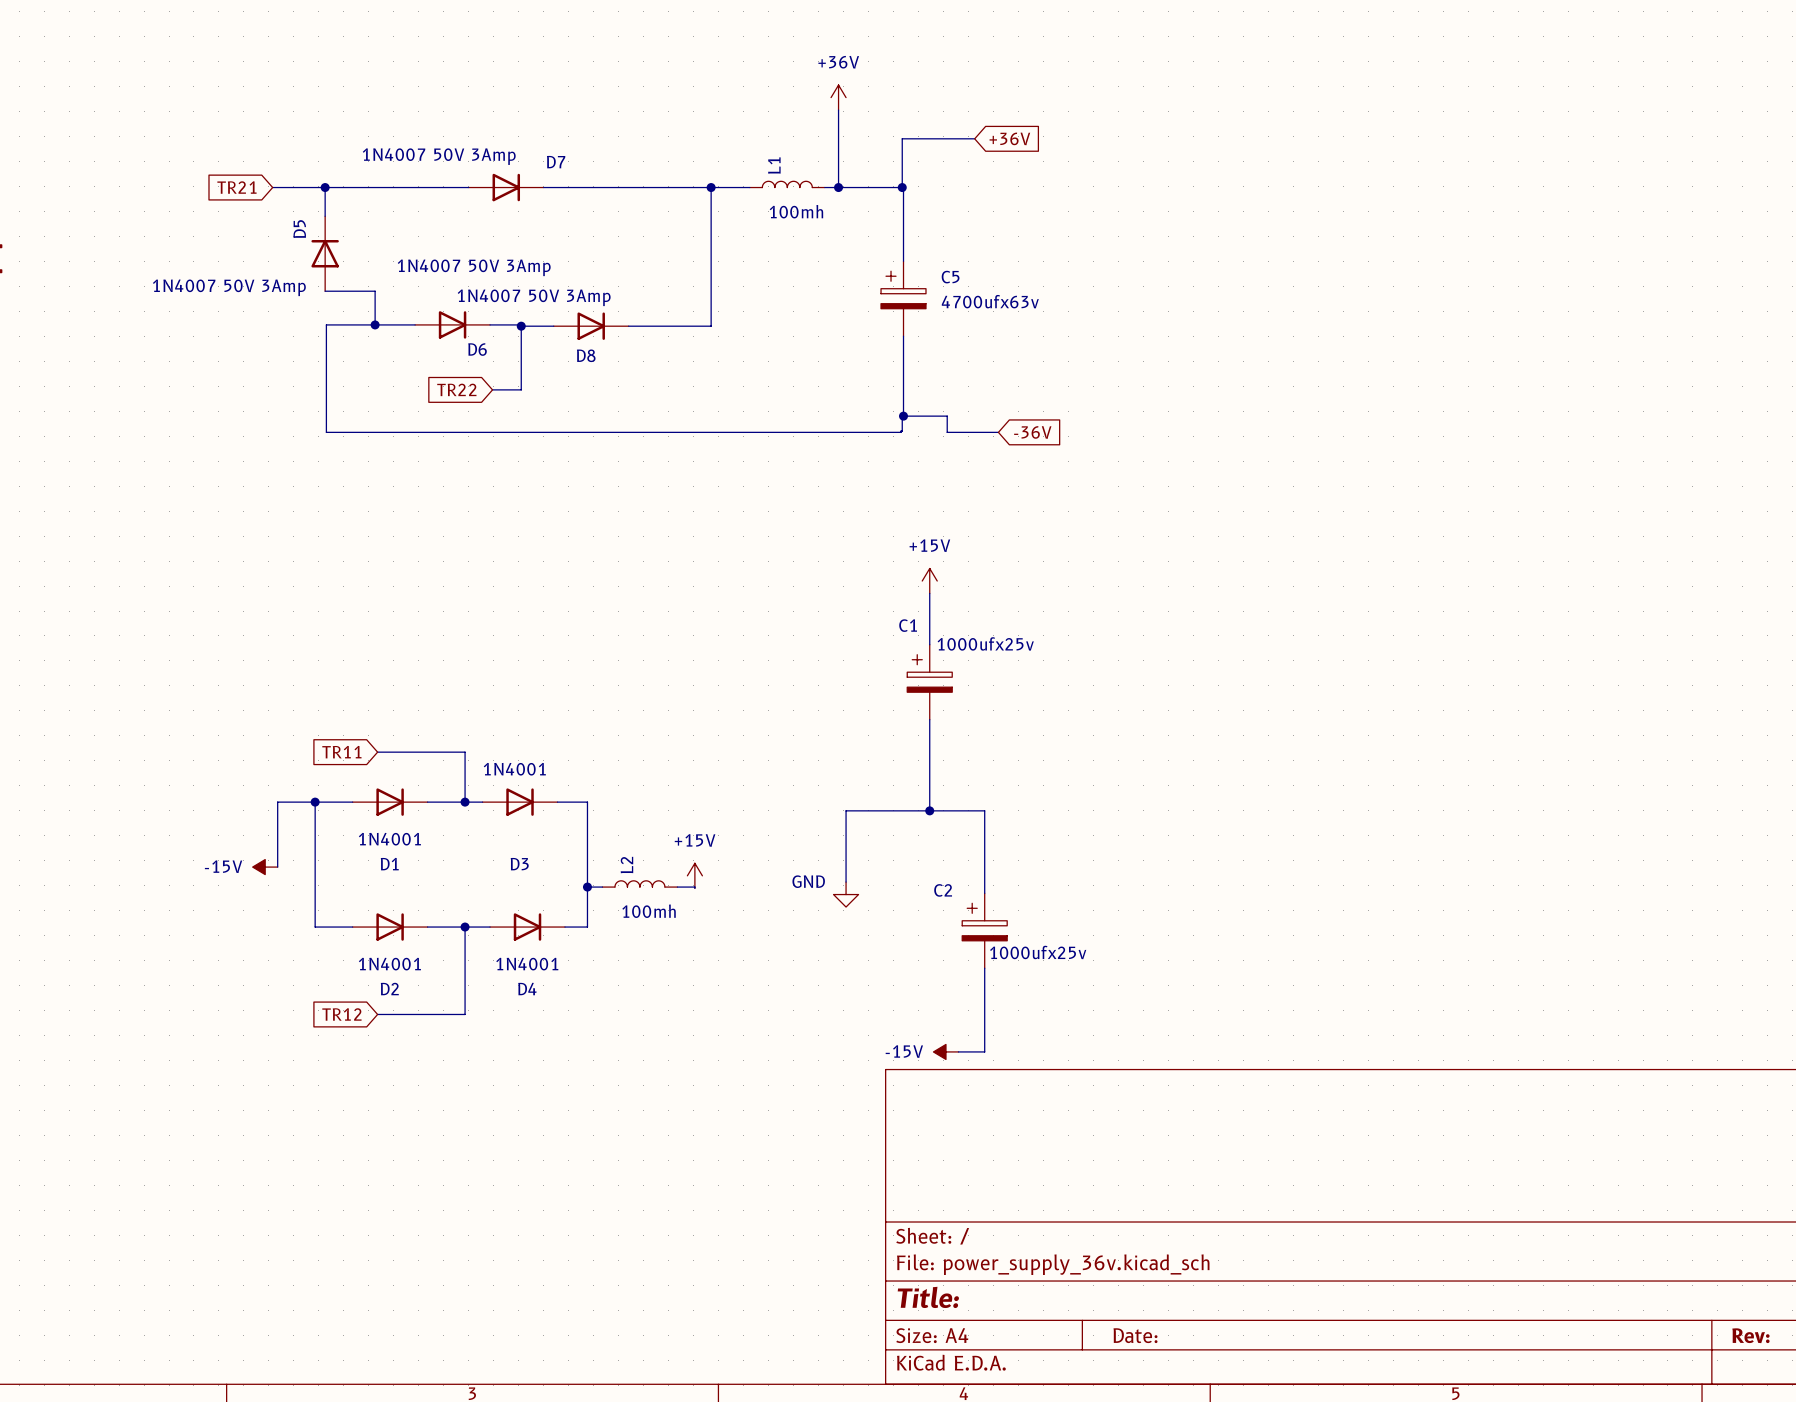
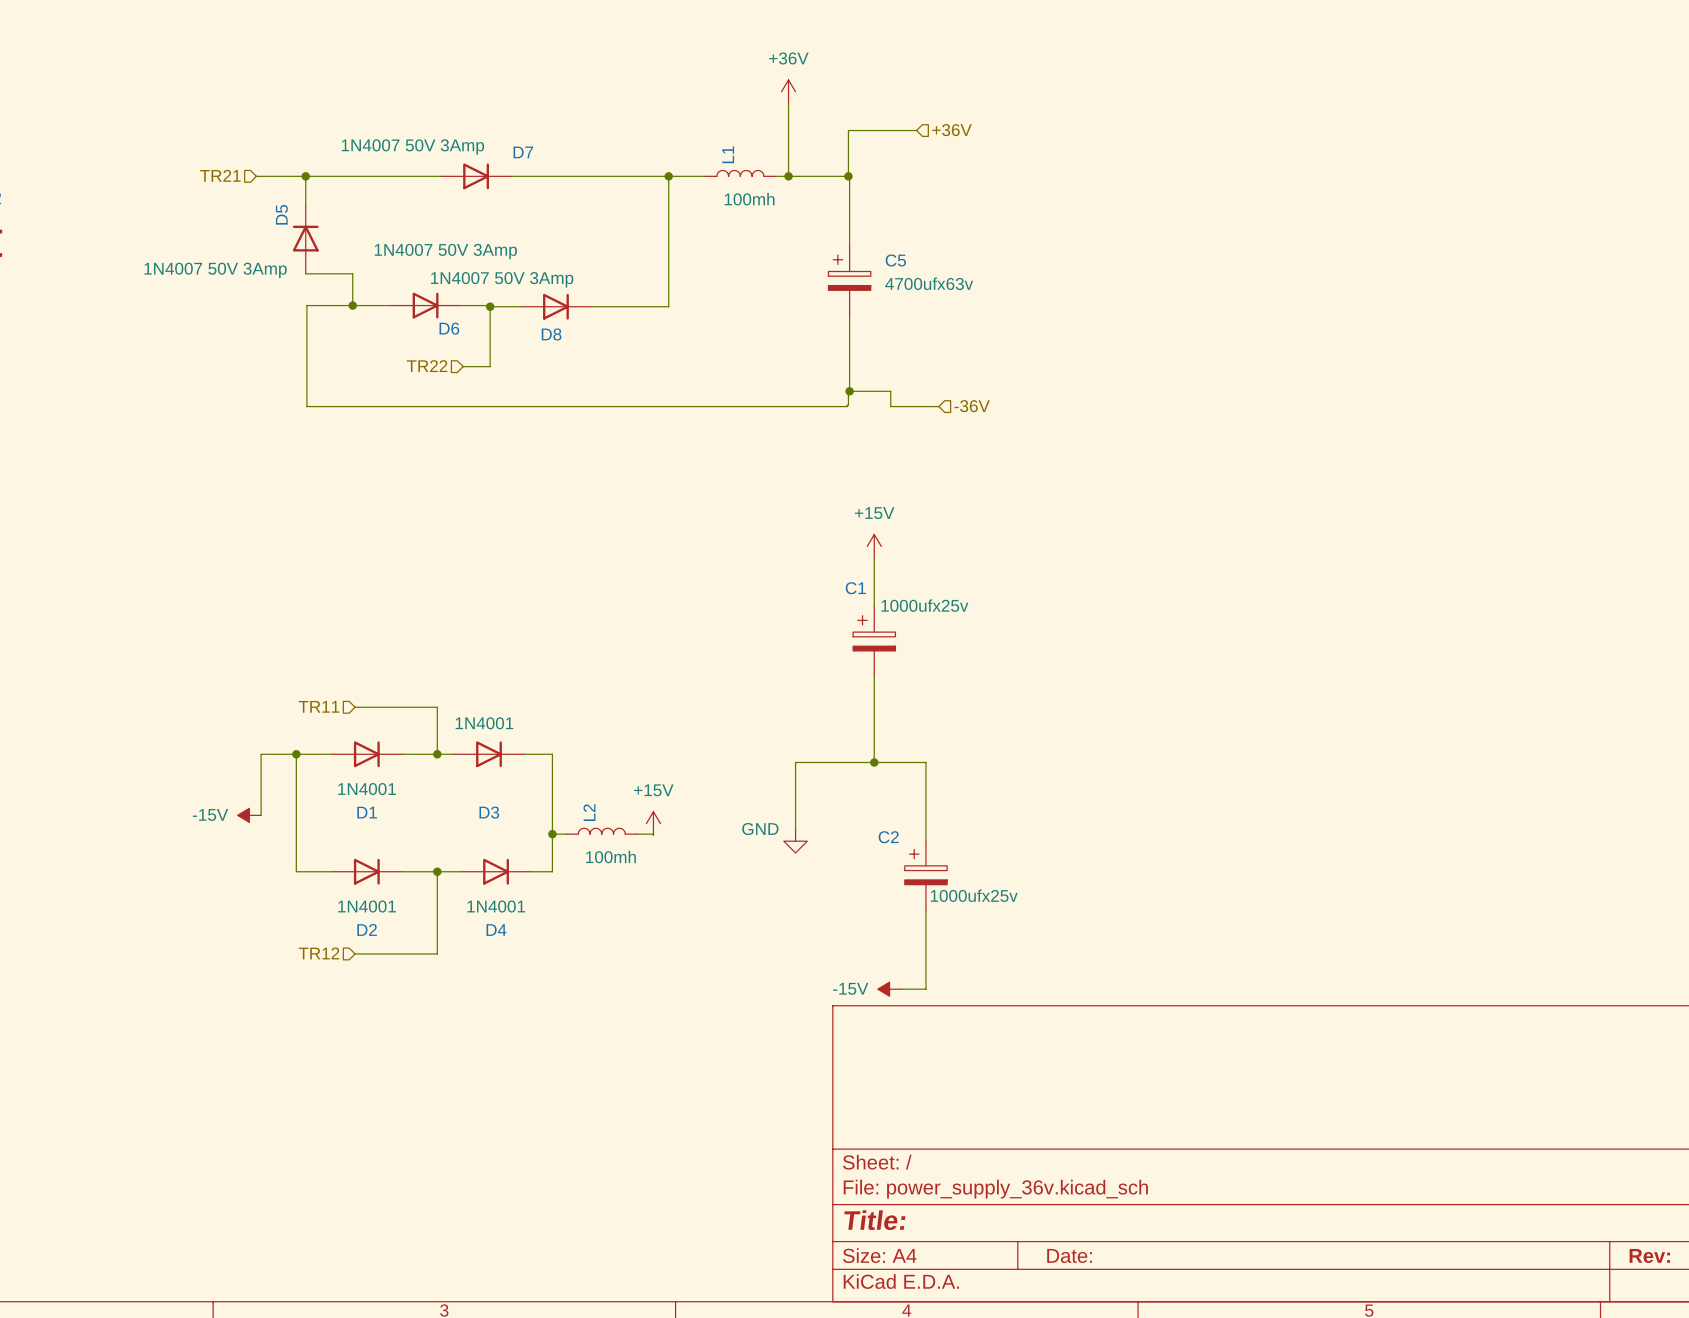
global label: +36V (1009, 138) -> none
hierarchical label: none -> +36V (952, 130)
hierarchical label: none -> TR21 (220, 175)
global label: TR21 (236, 187) -> none
hierarchical label: none -> TR22 (427, 366)
global label: TR22 (456, 389) -> none
hierarchical label: none -> -36V (972, 406)
global label: -36V (1032, 432) -> none
hierarchical label: none -> TR11 (319, 706)
global label: TR11 (341, 752) -> none
hierarchical label: none -> TR12 (319, 953)
global label: TR12 (341, 1014) -> none

